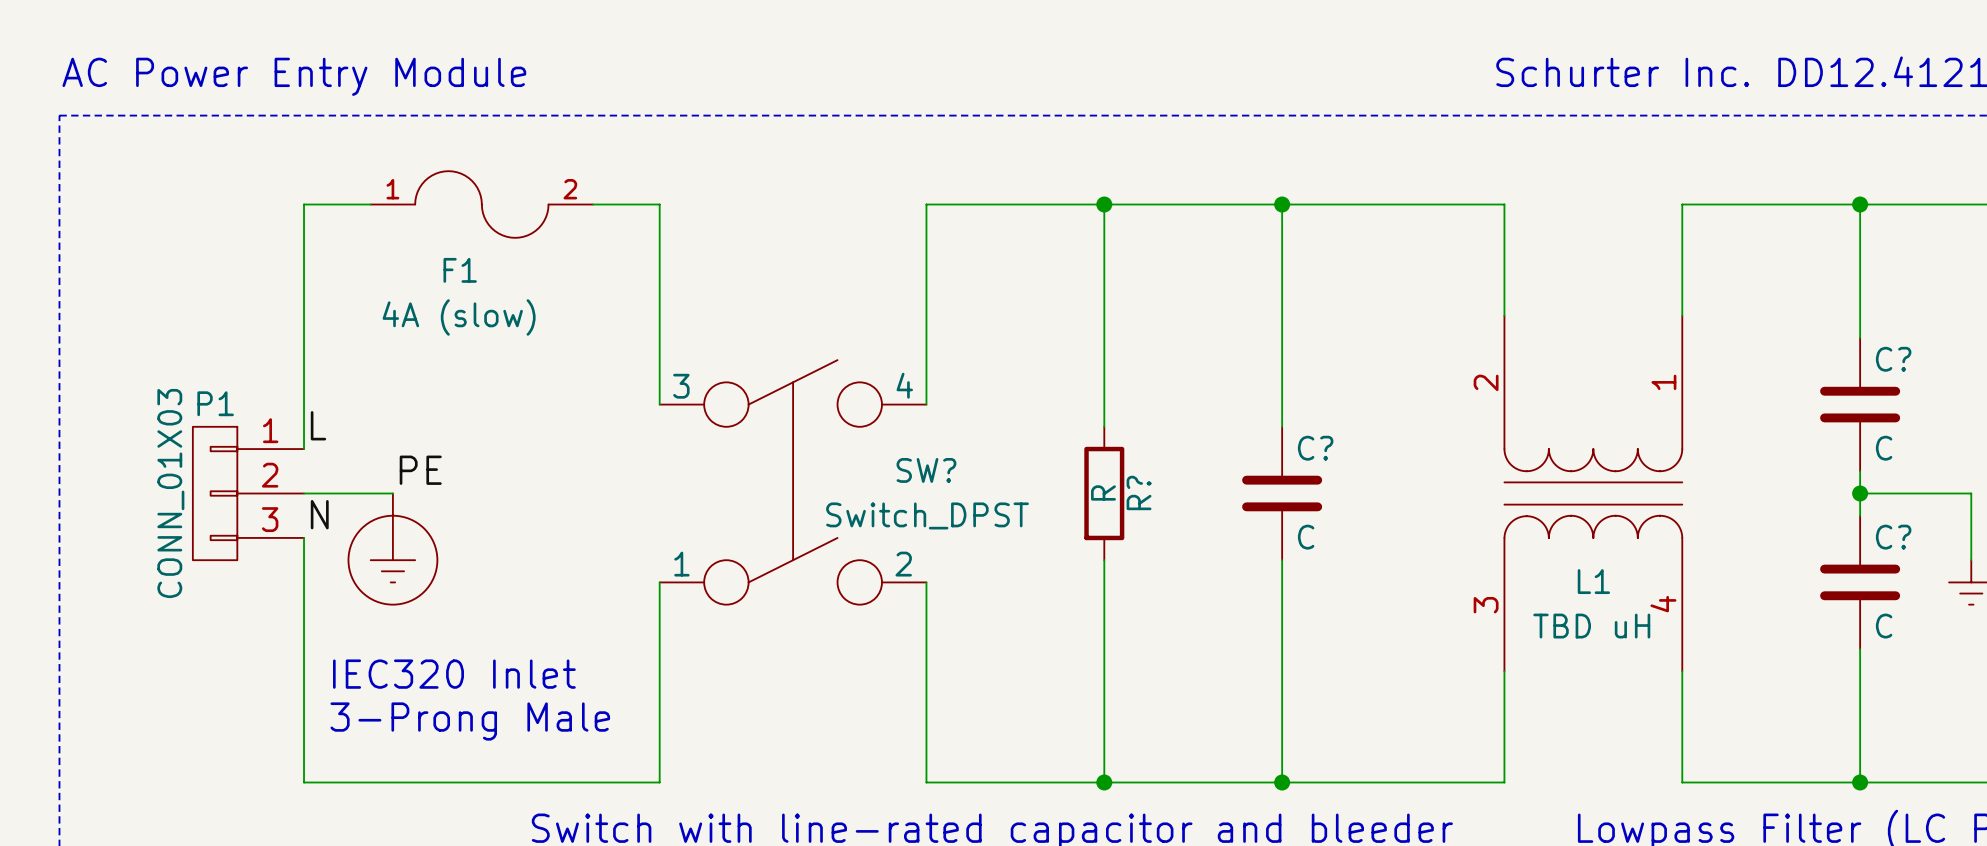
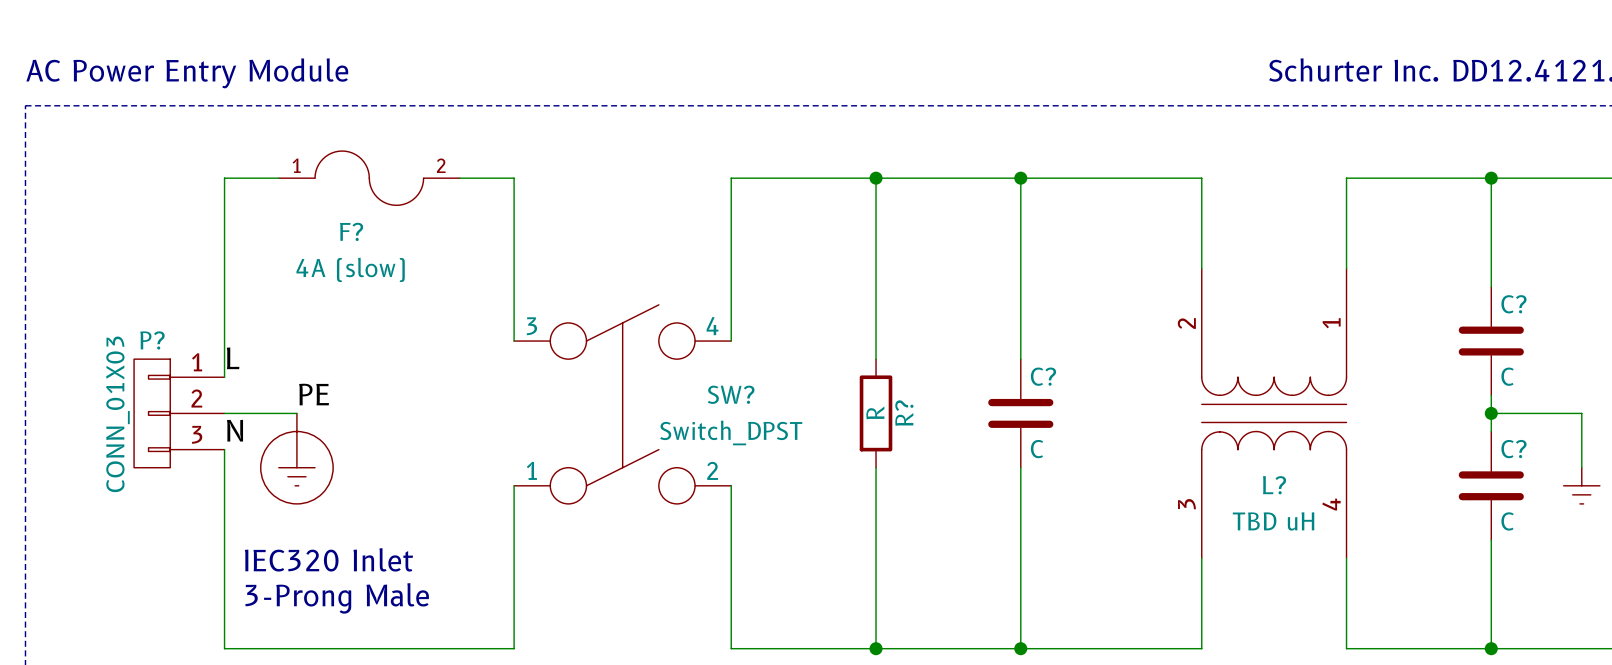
F1 name: F1 (460, 270) -> F? (351, 231)
P1 name: P1 (215, 403) -> P? (152, 340)
L1 name: L1 (1593, 581) -> L? (1274, 485)

